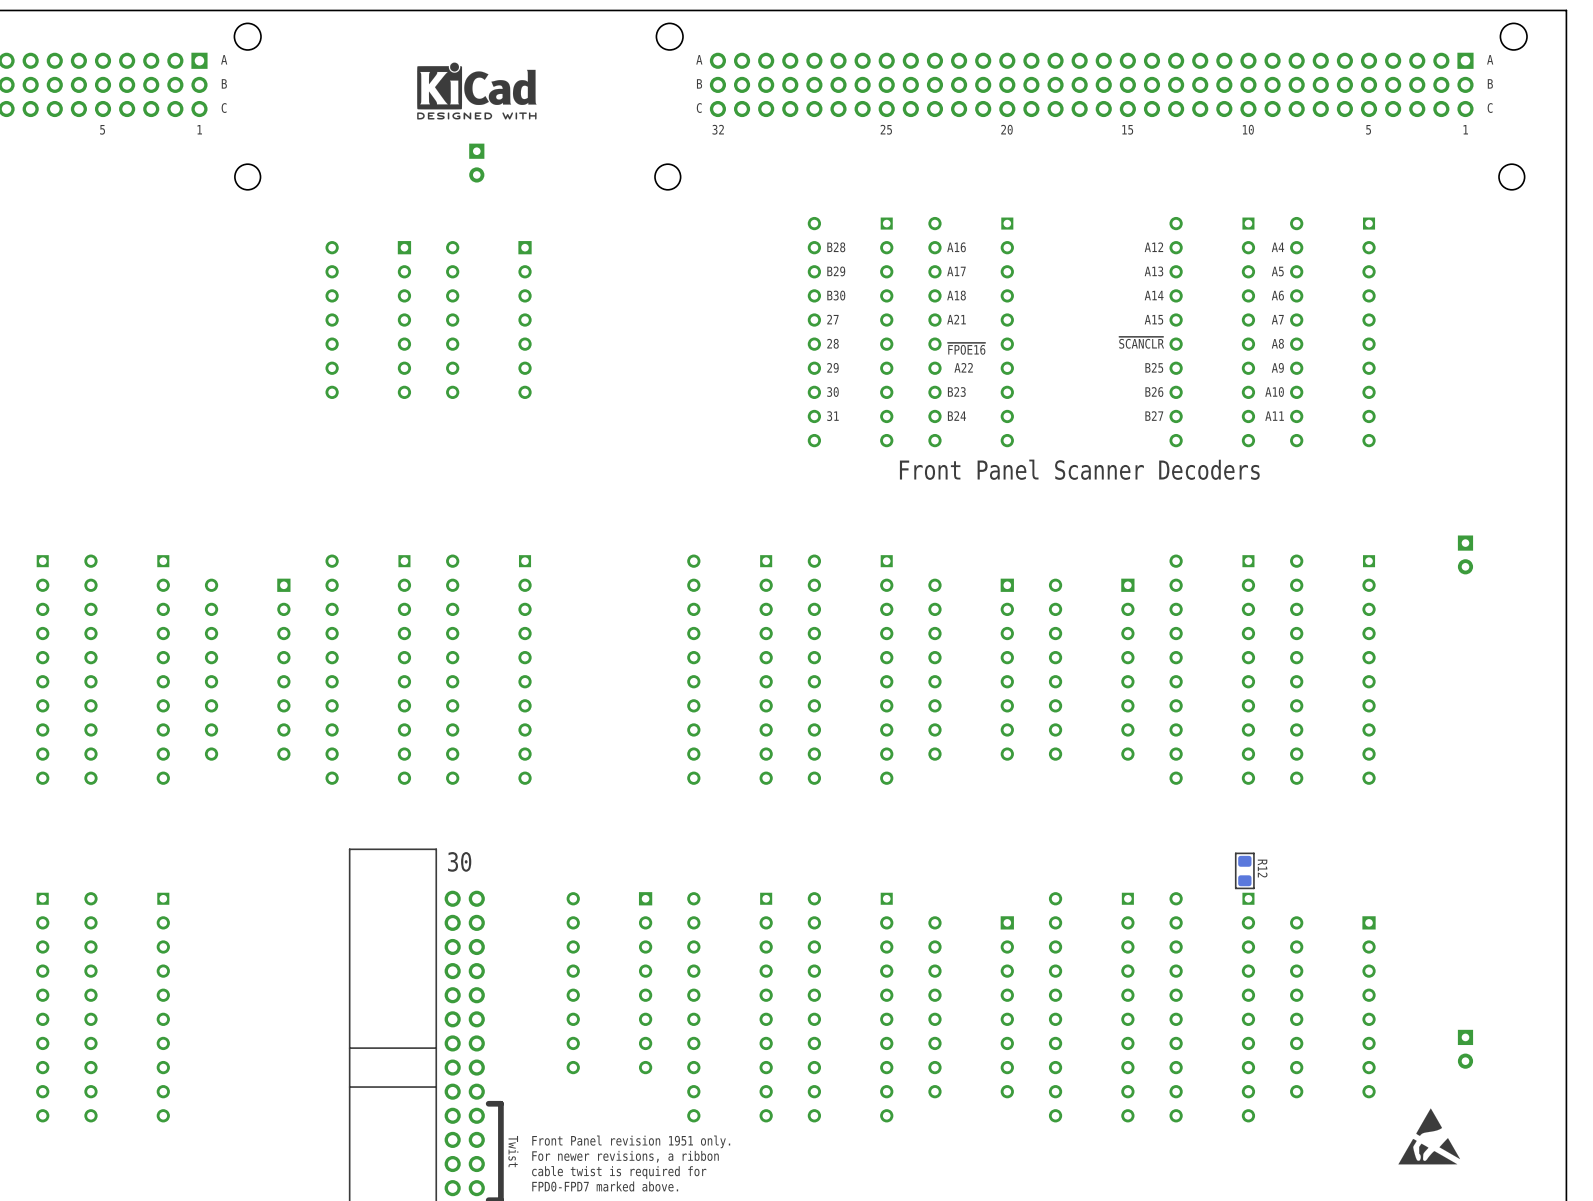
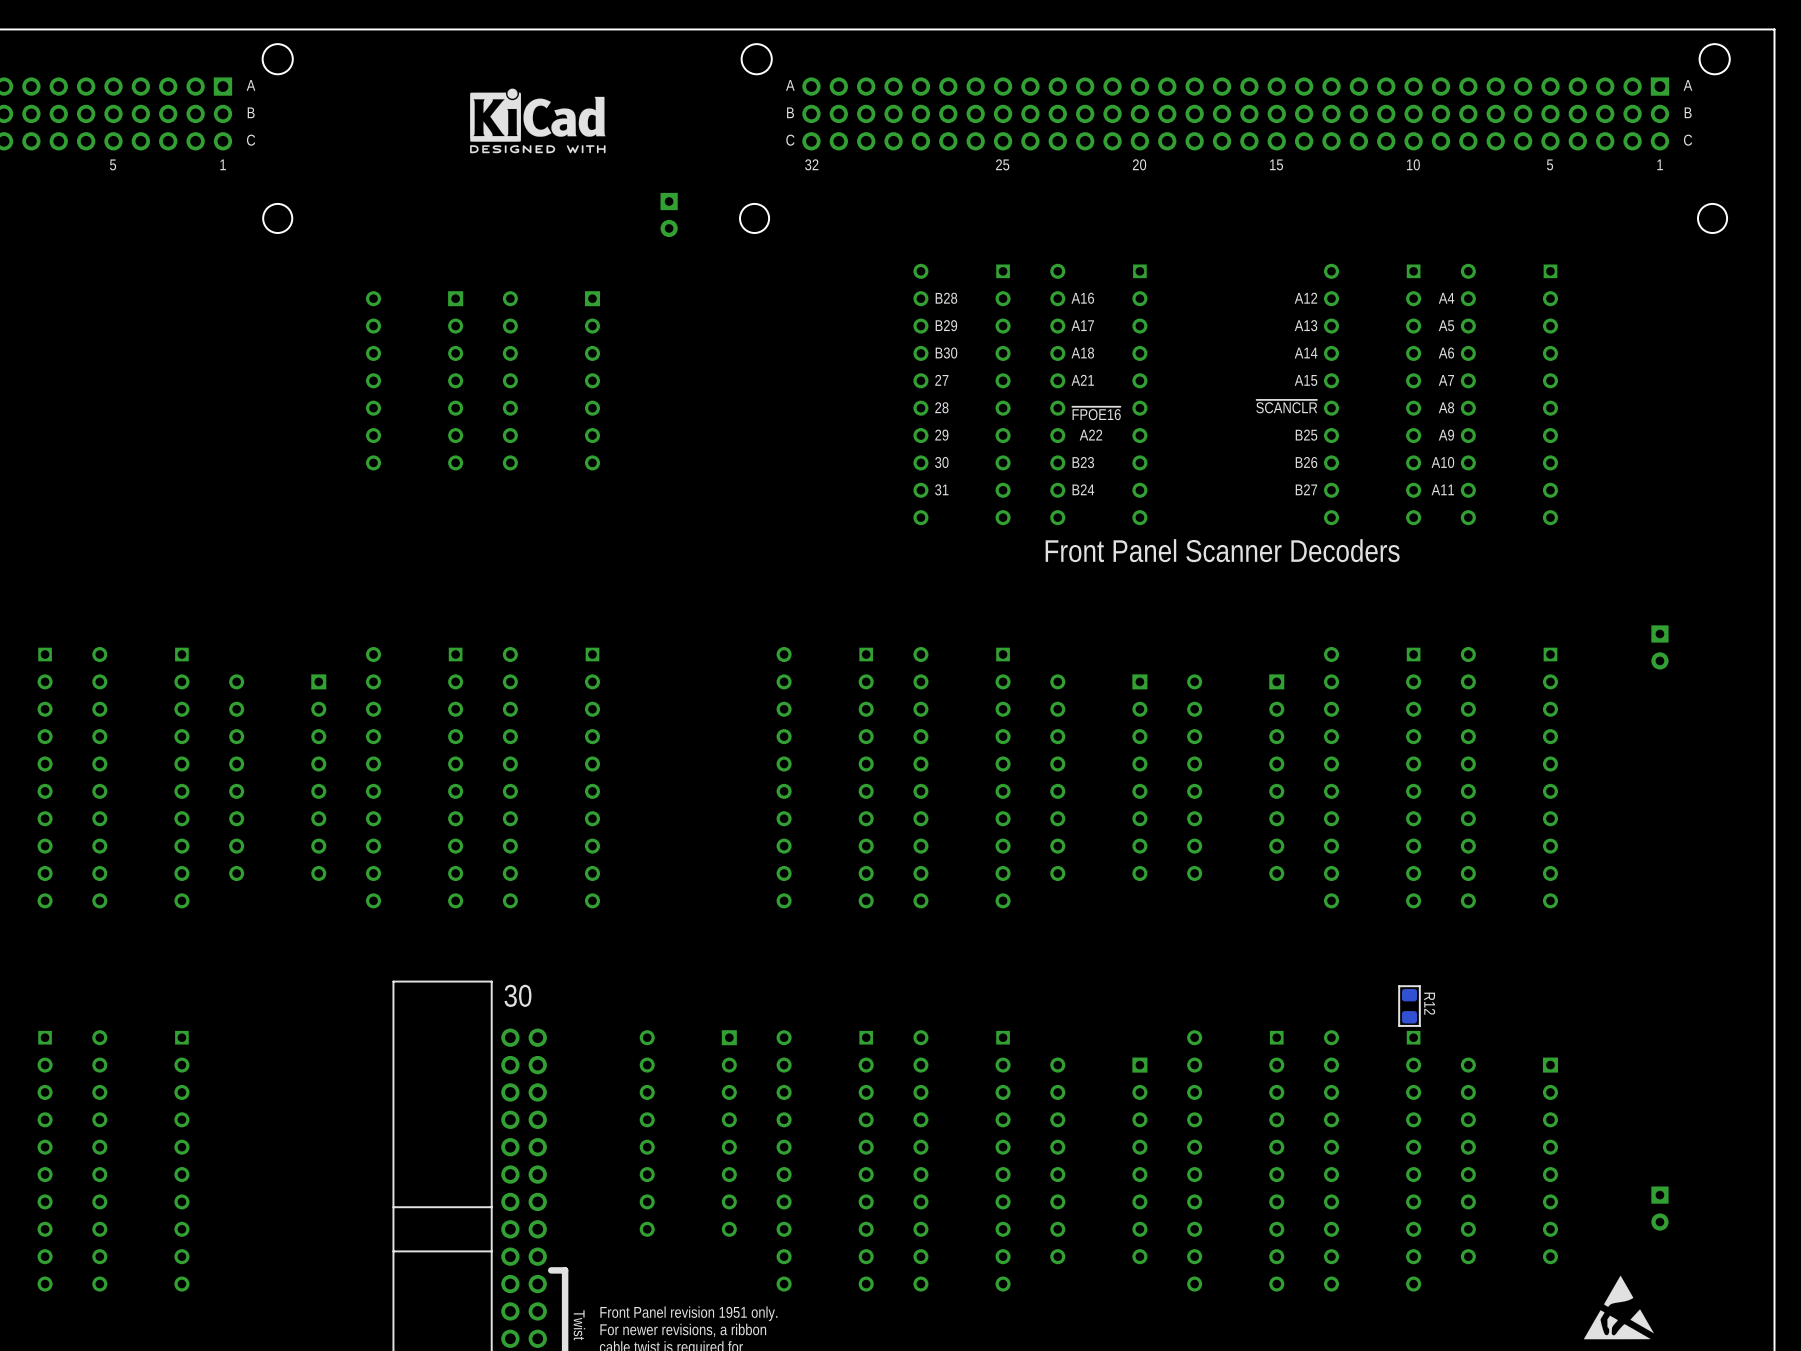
part position: (476, 163) -> (669, 214)

